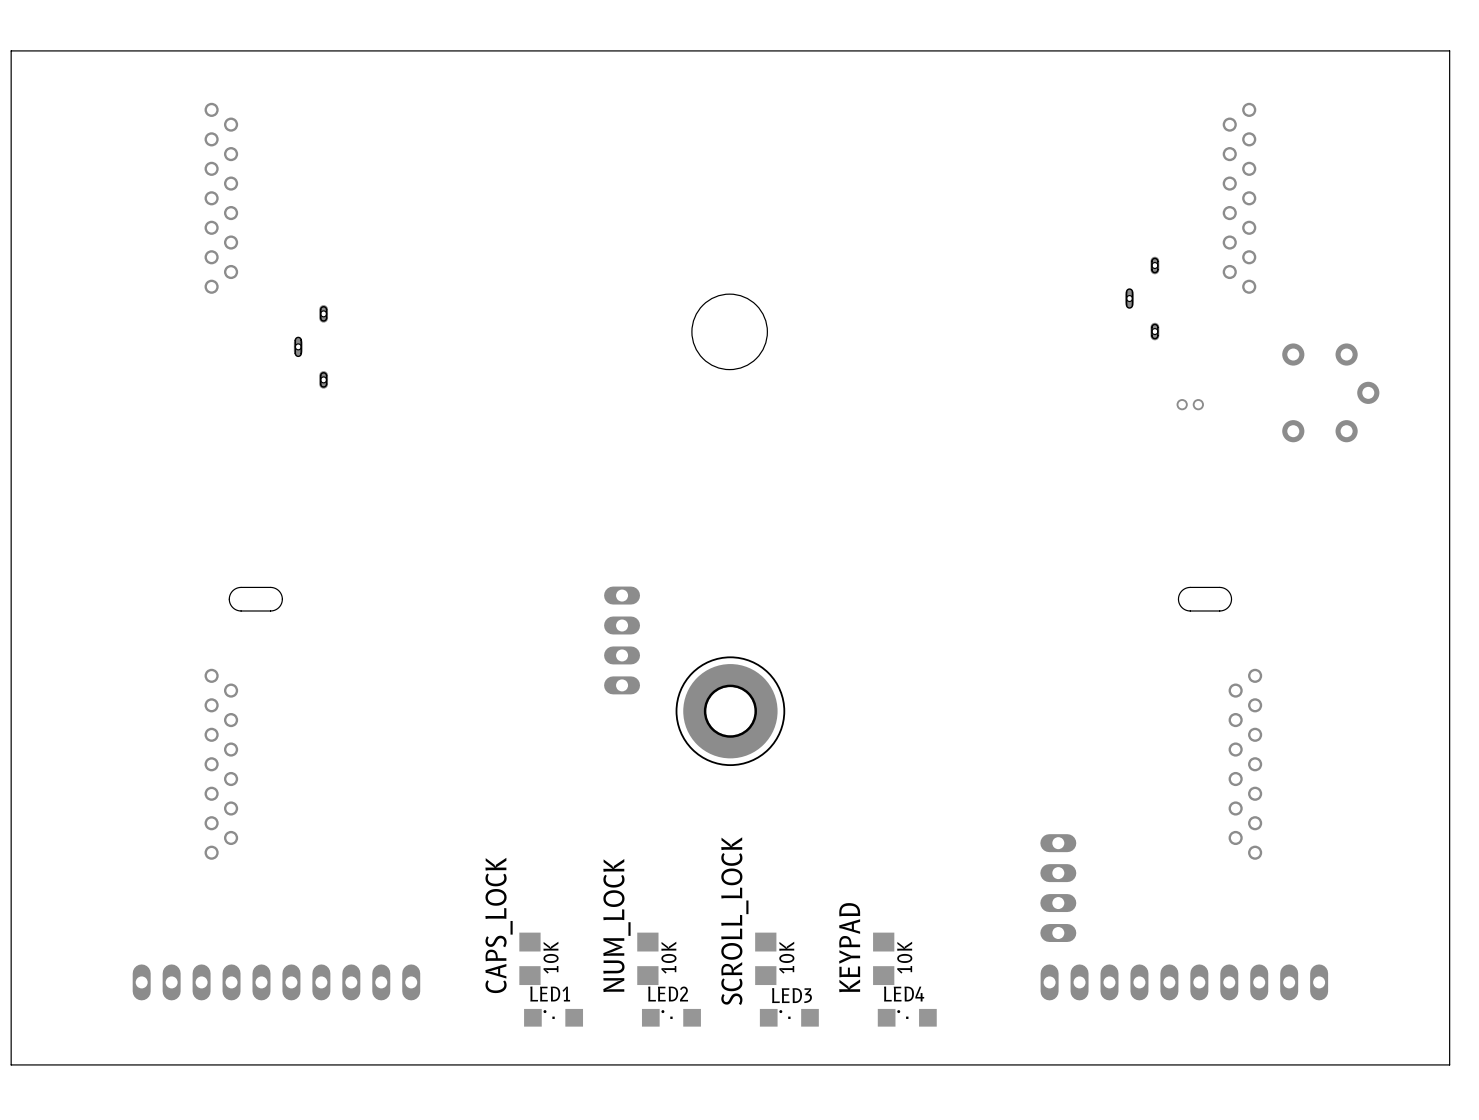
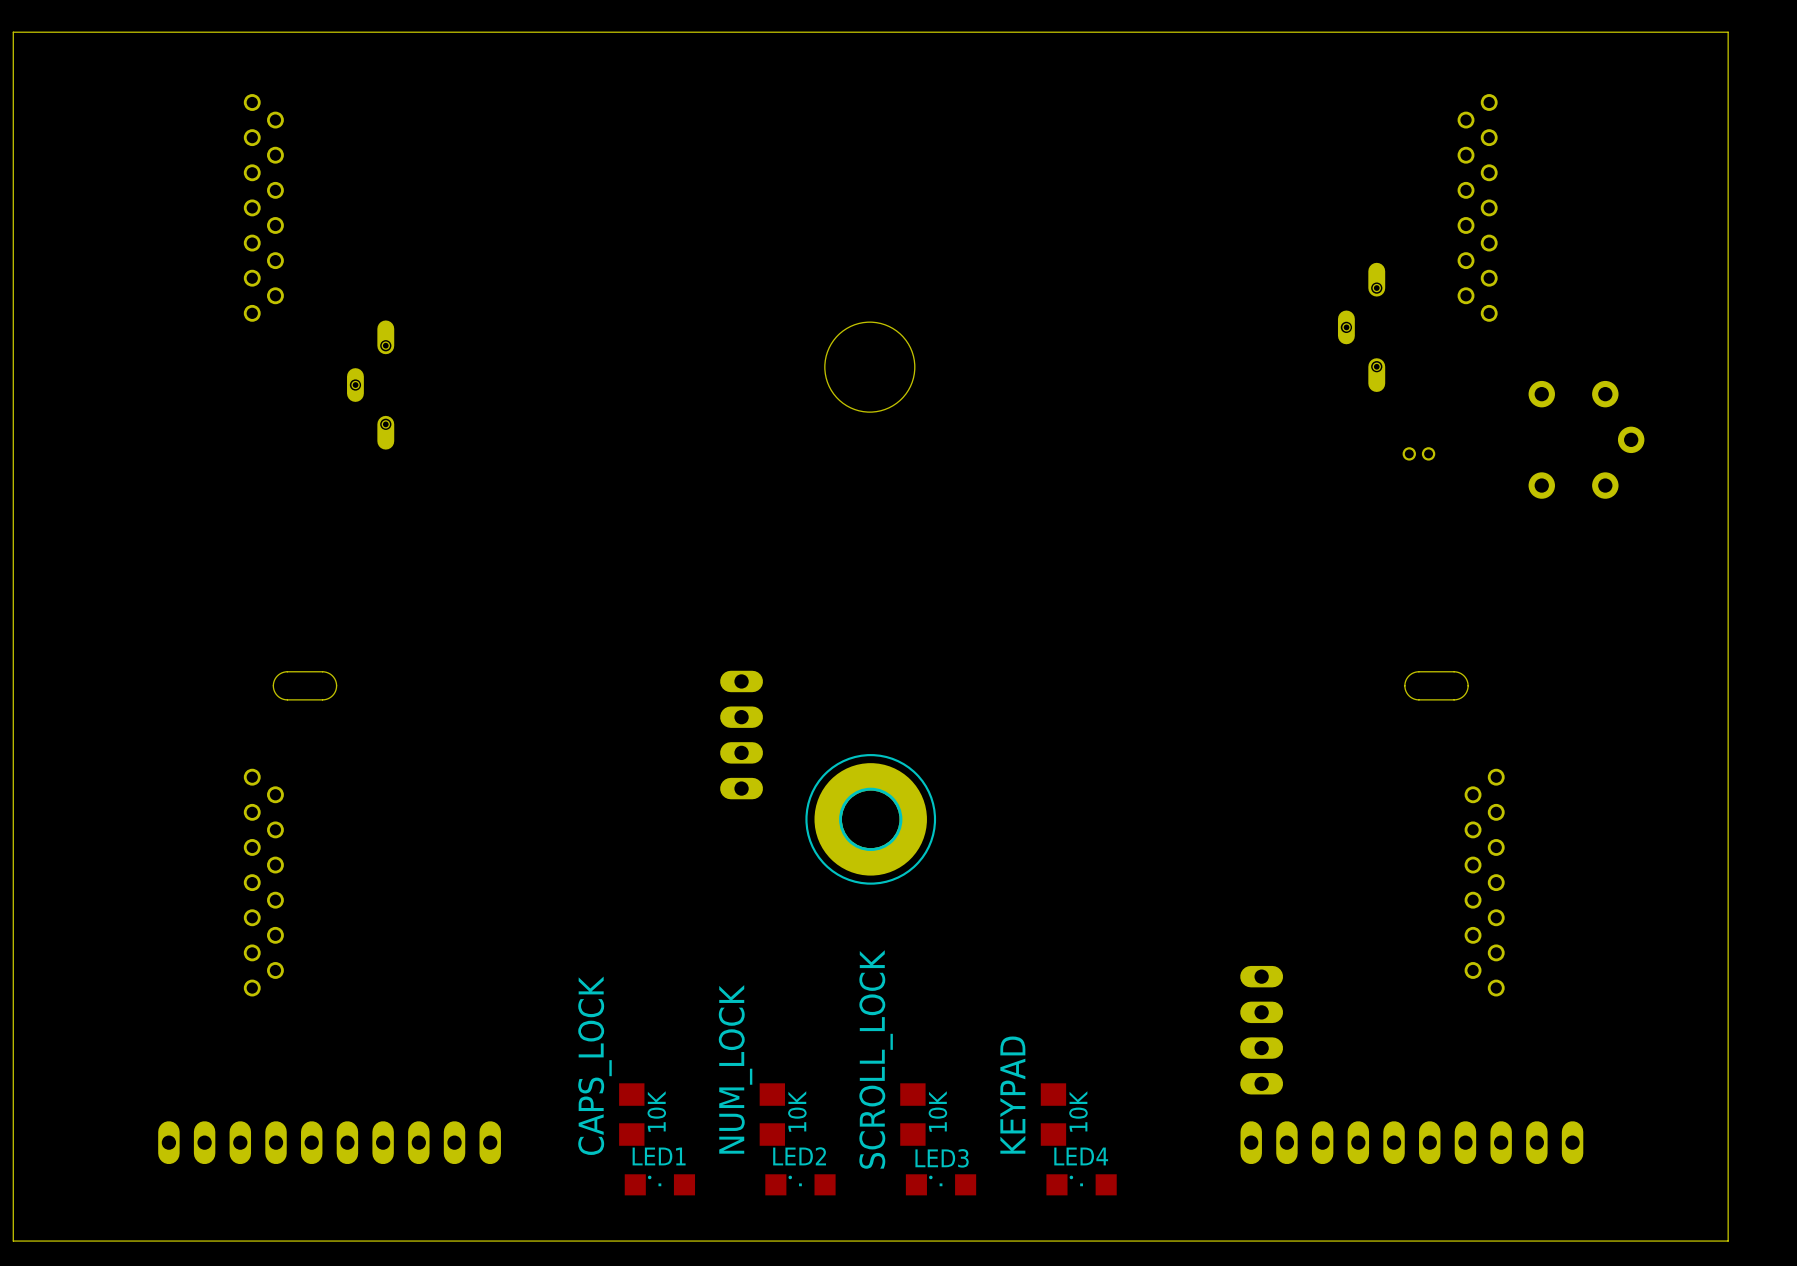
part footprint: [1125, 256, 1160, 341] -> [1337, 262, 1386, 392]
part footprint: [293, 305, 329, 389] -> [347, 320, 395, 450]

